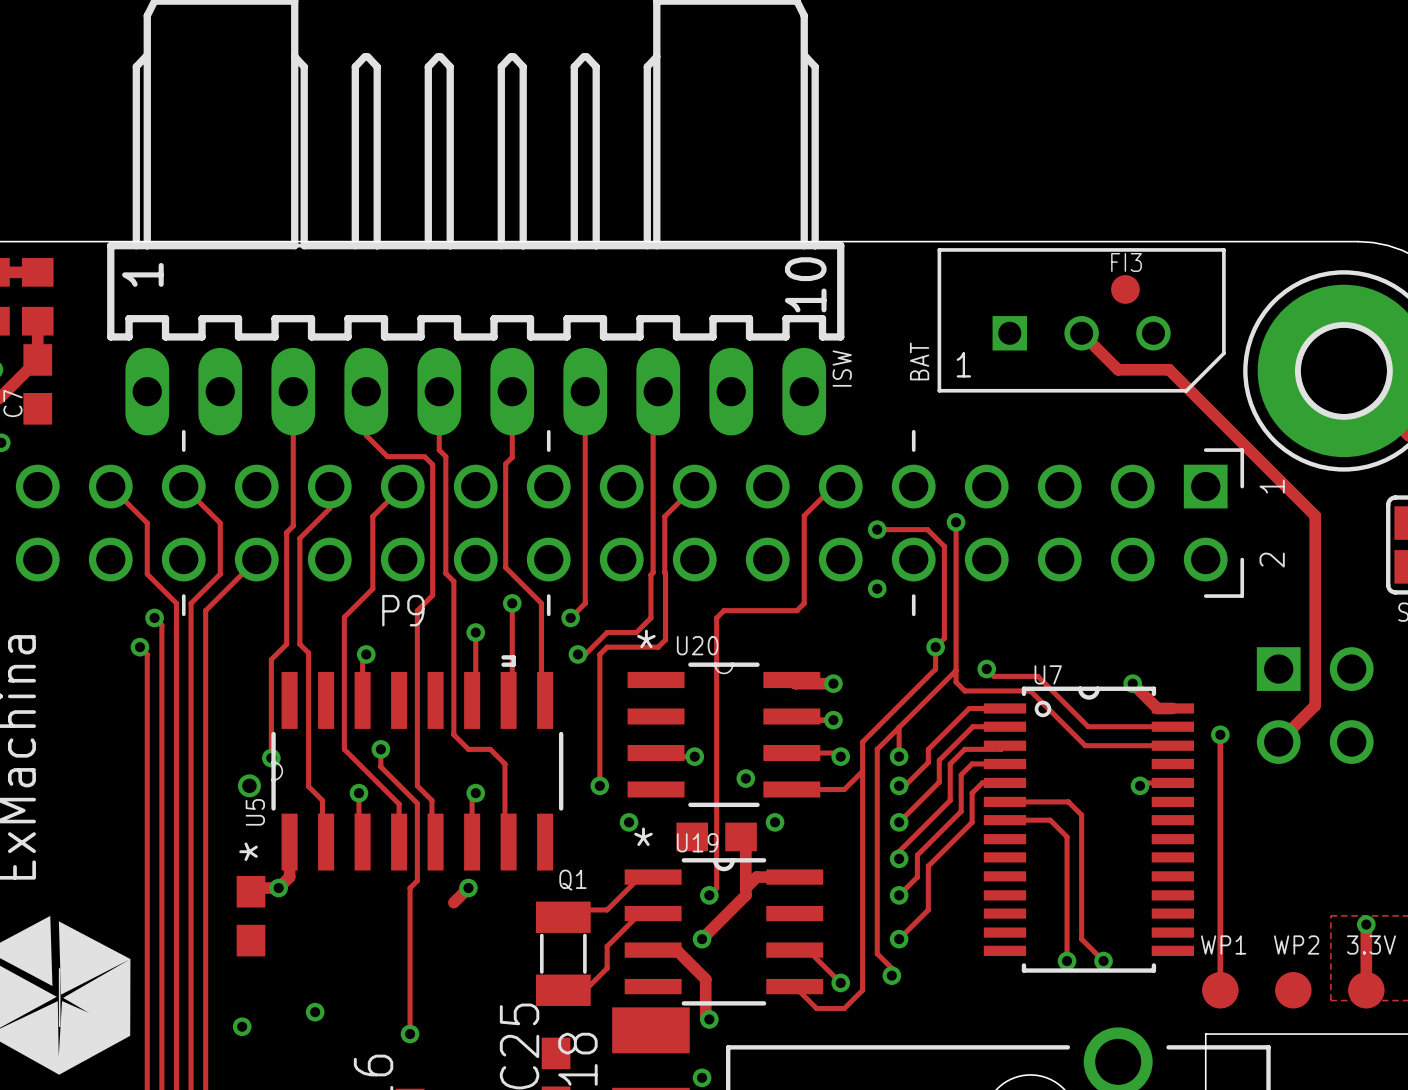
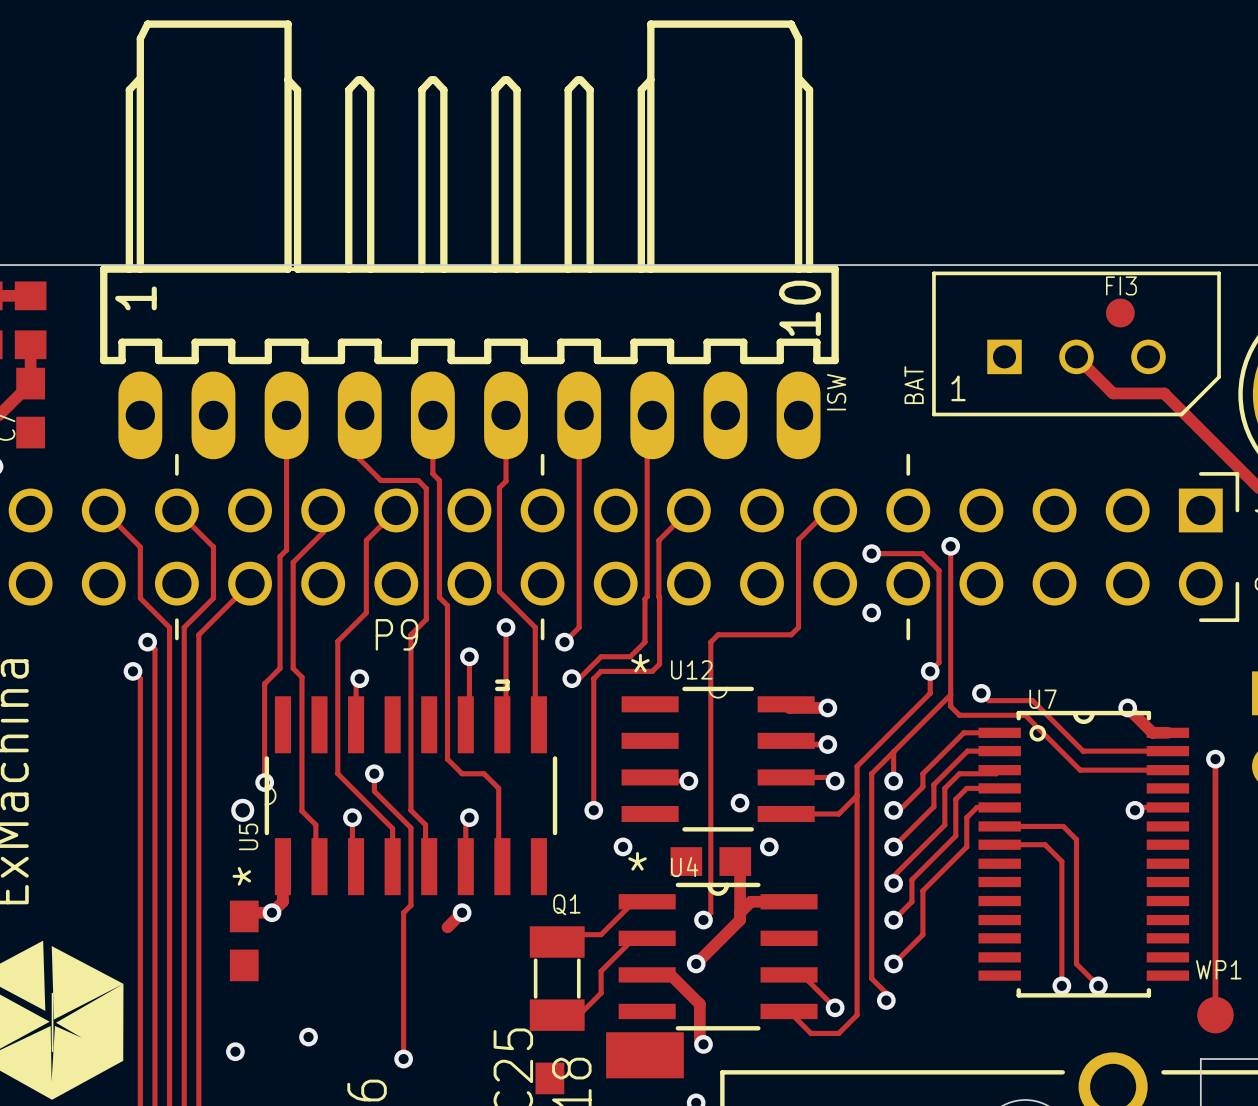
U20 name: U20 (697, 645) -> U12 (691, 669)
U19 name: U19 (697, 842) -> U4 (684, 866)

